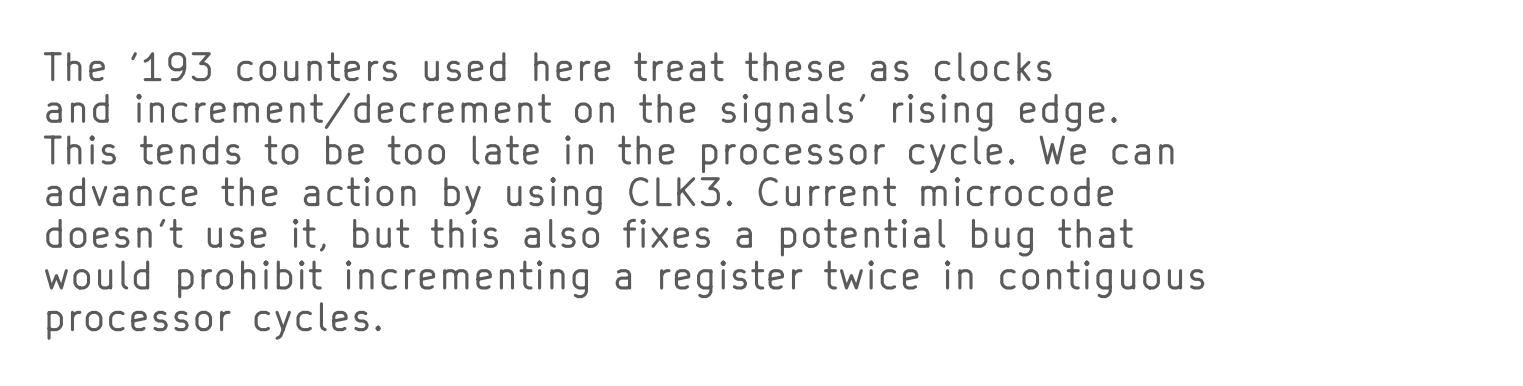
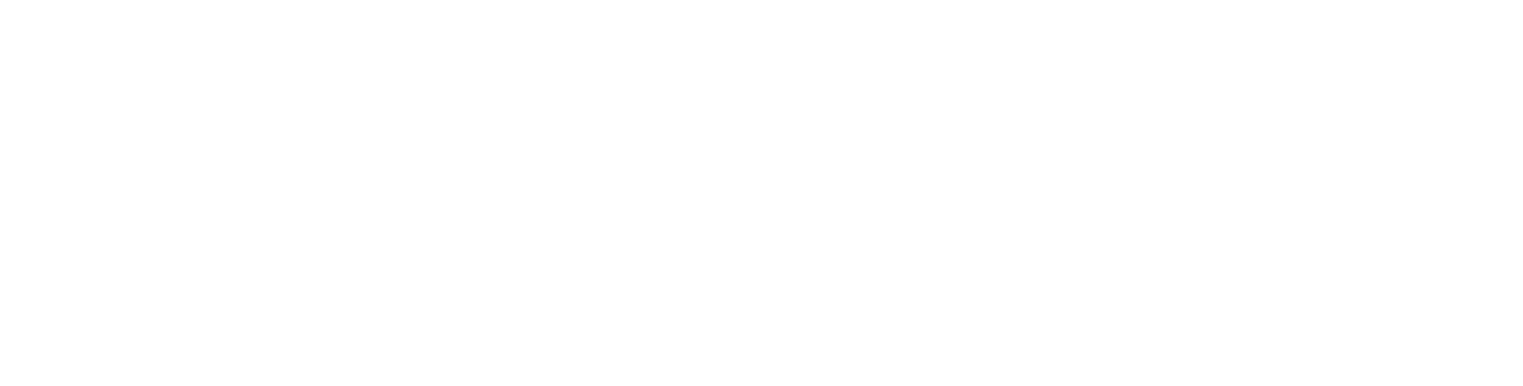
text: The '193 counters used here treat these as clocks (547, 66) -> none
text: and increment/decrement on the signals' rising edge. (581, 112) -> none
text: This tends to be too late in the processor cycle. We can (608, 154) -> none
text: advance the action by using CLK3. Current microcode (579, 195) -> none
text: doesn't use it, but this also fixes a potential bug that (589, 237) -> none
text: would prohibit incrementing a register twice in contiguous (624, 279) -> none
text: processor cycles. (214, 321) -> none

